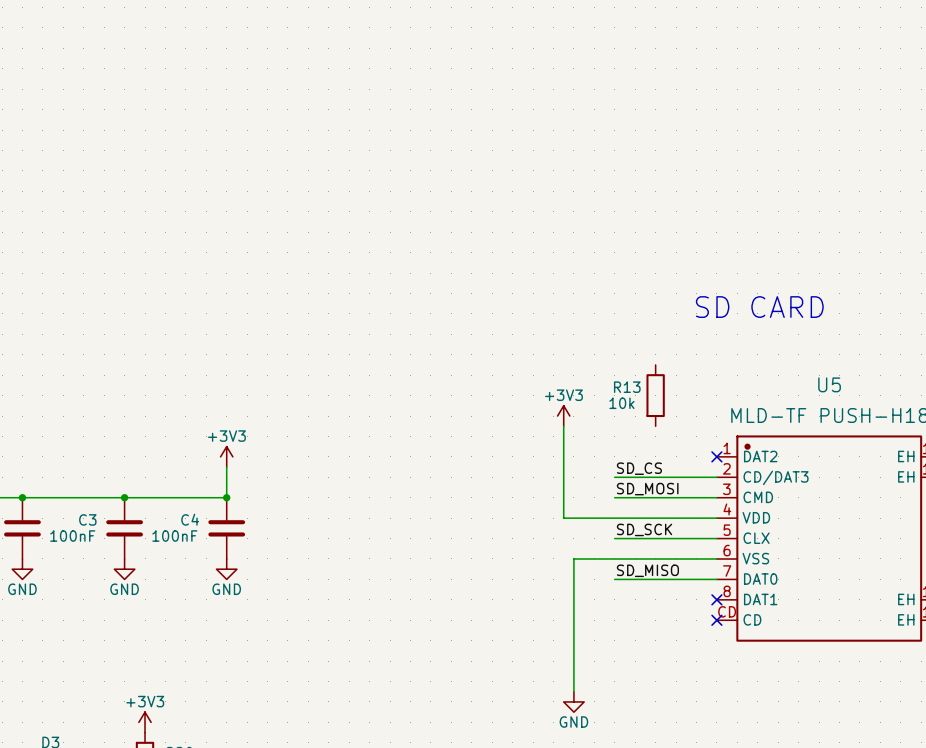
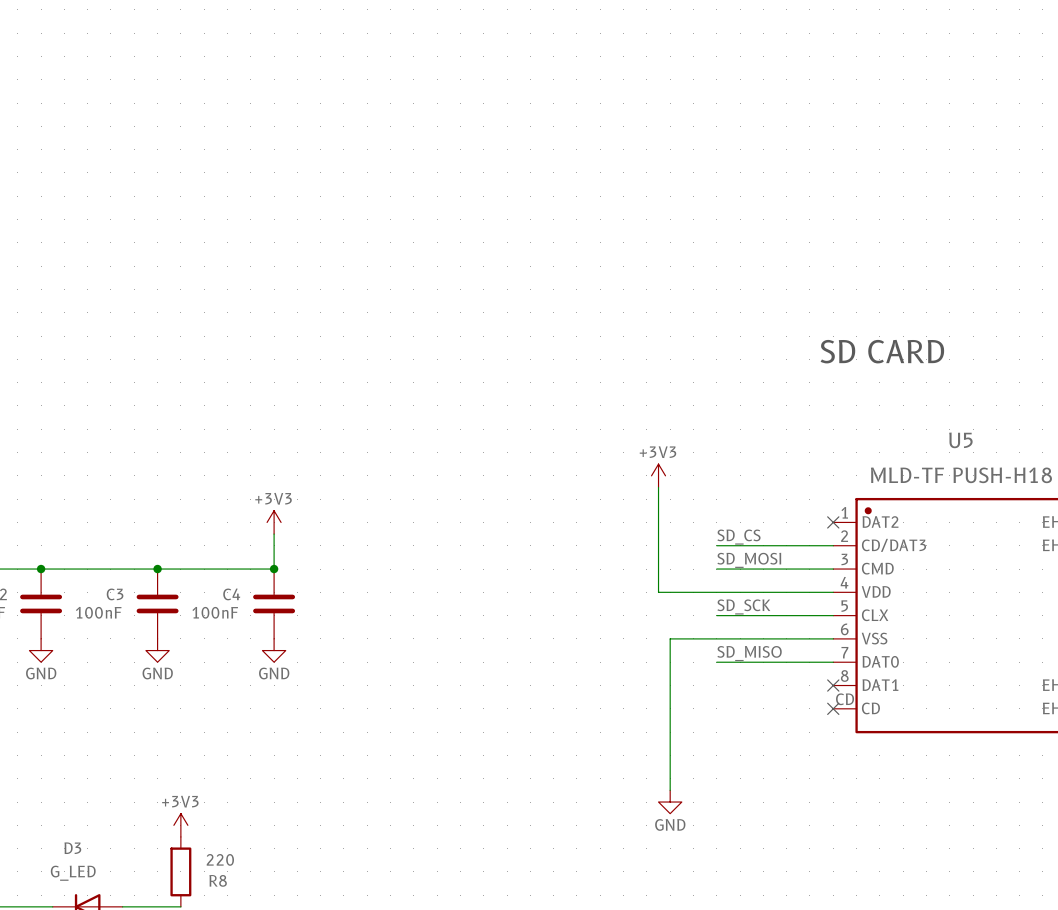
R13: 10k (655, 395) -> none

